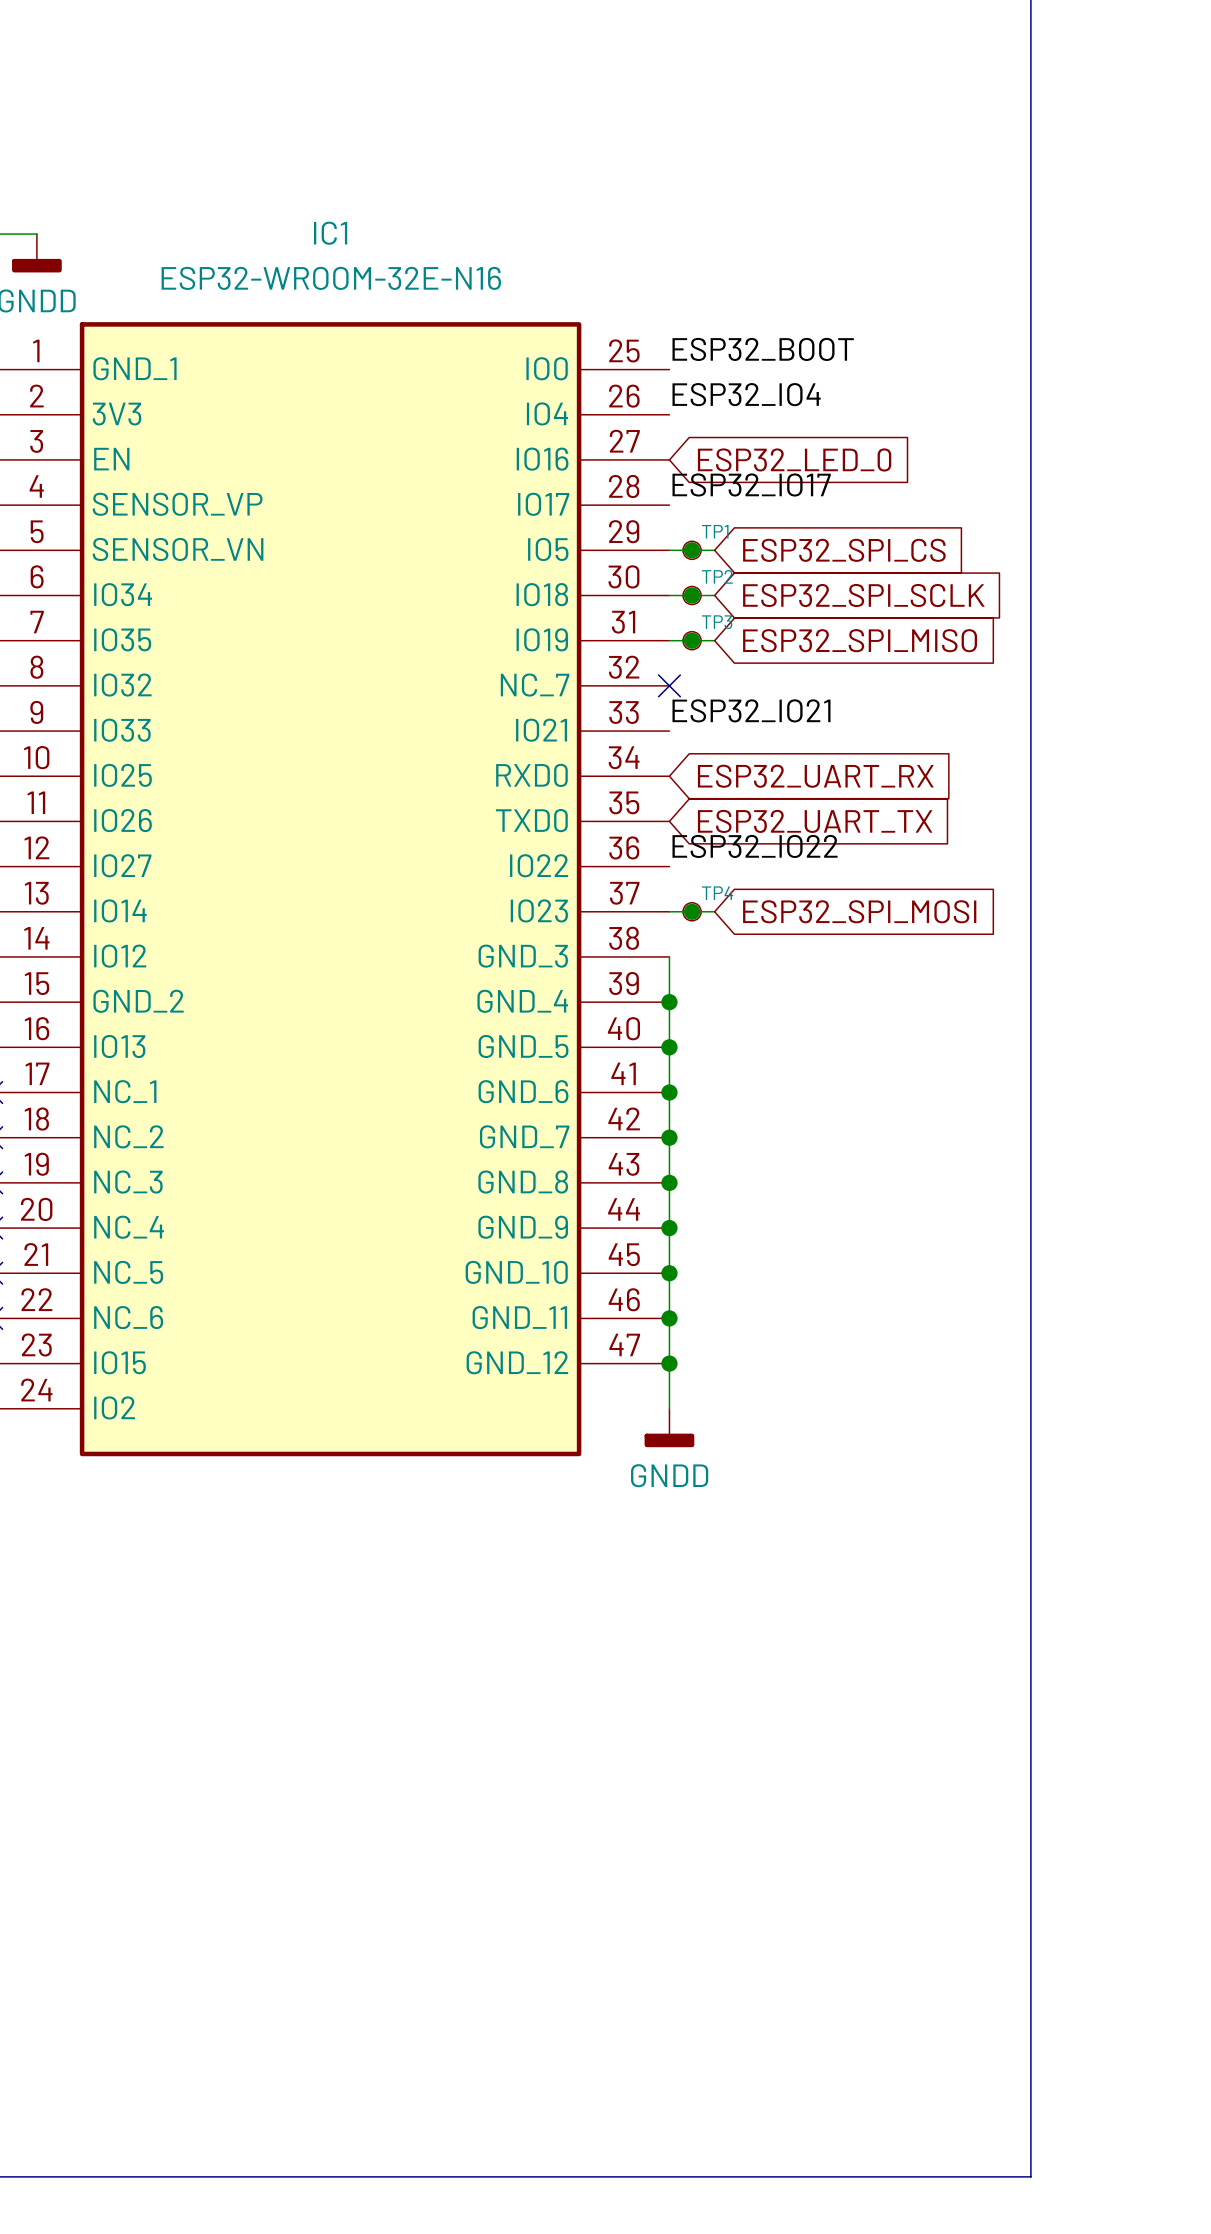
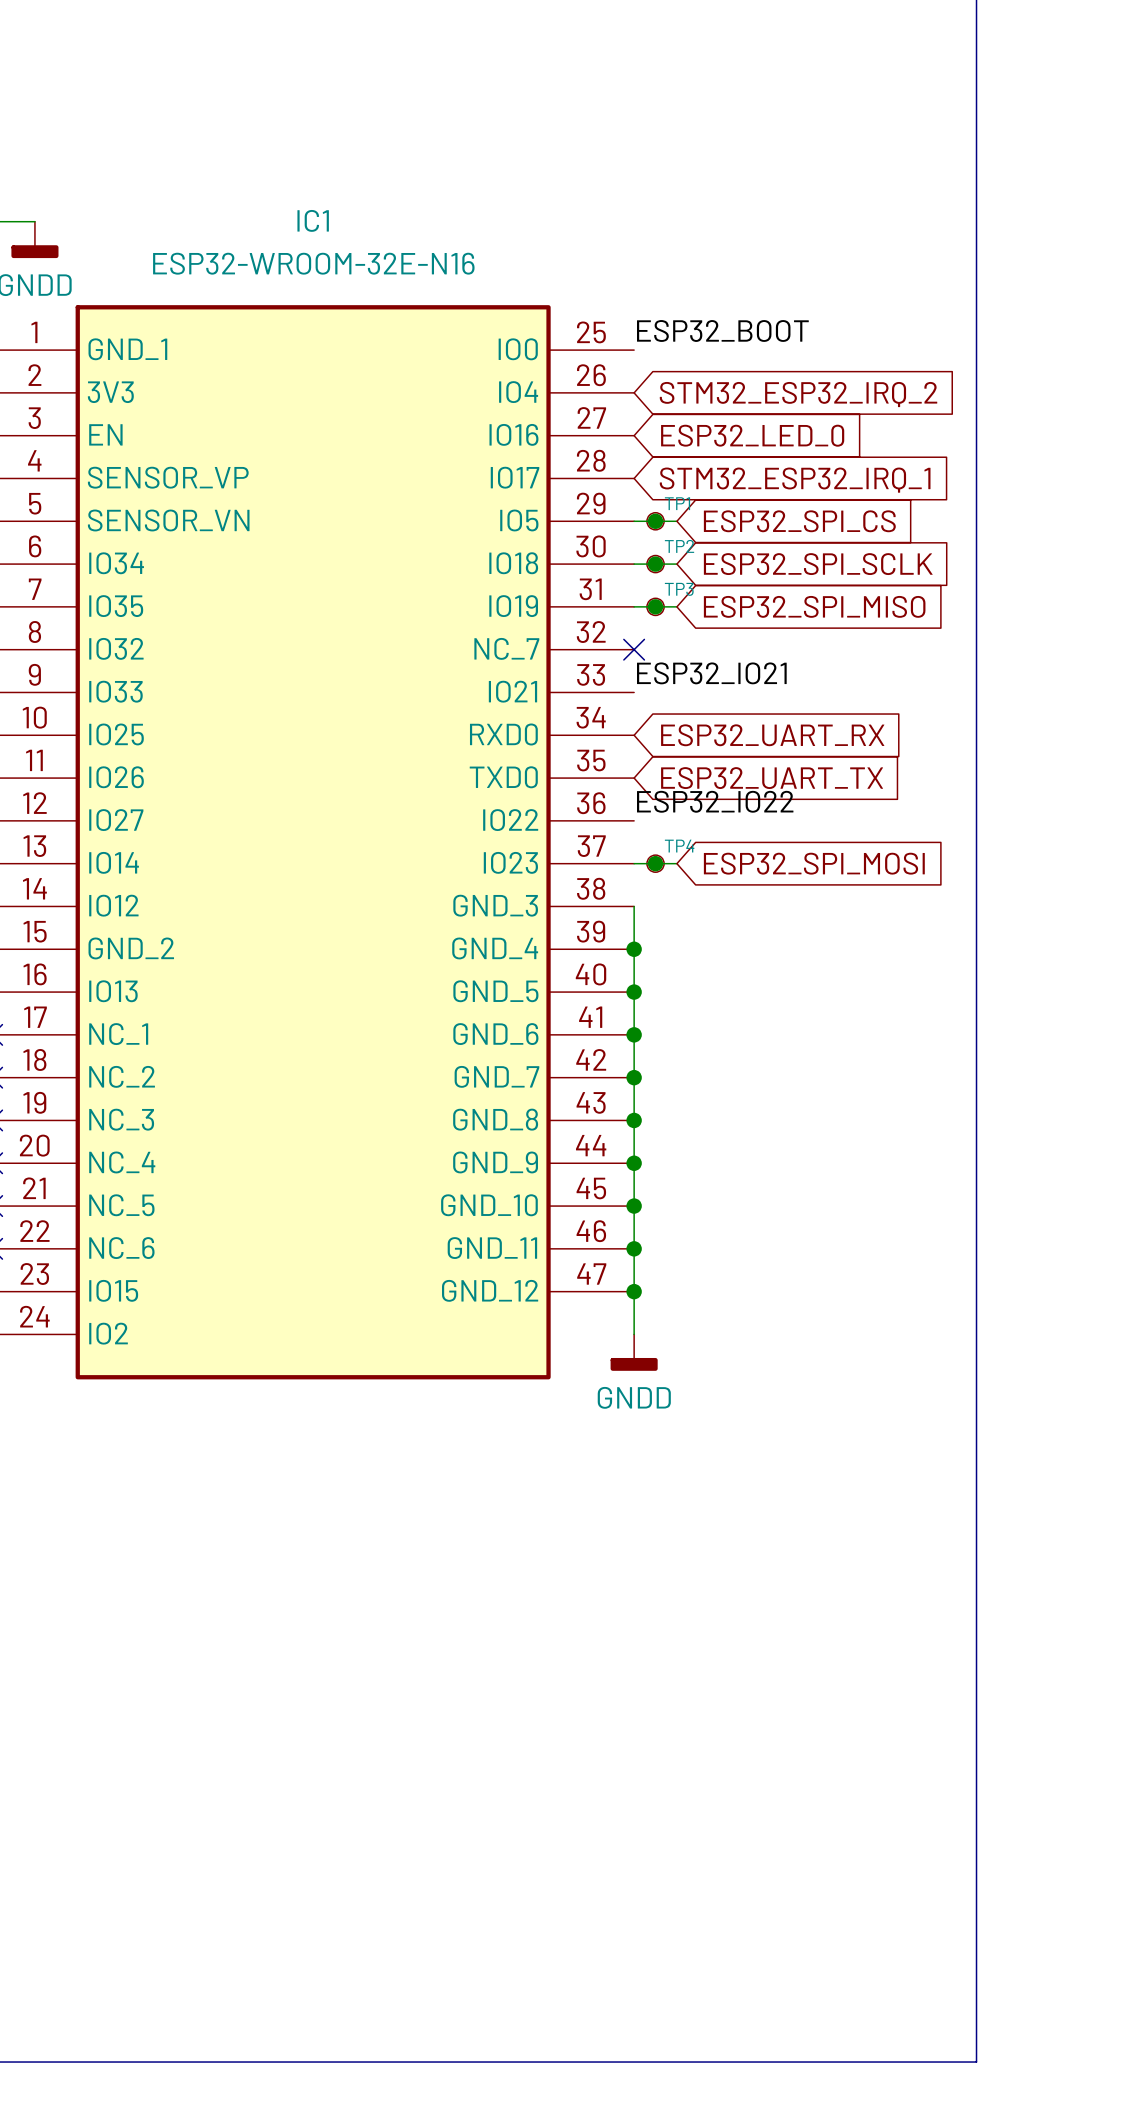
label: ESP32_IO4 (746, 394) -> none
global label: none -> STM32_ESP32_IRQ_2 (798, 394)
label: ESP32_IO17 (751, 484) -> none
global label: none -> STM32_ESP32_IRQ_1 (795, 480)

